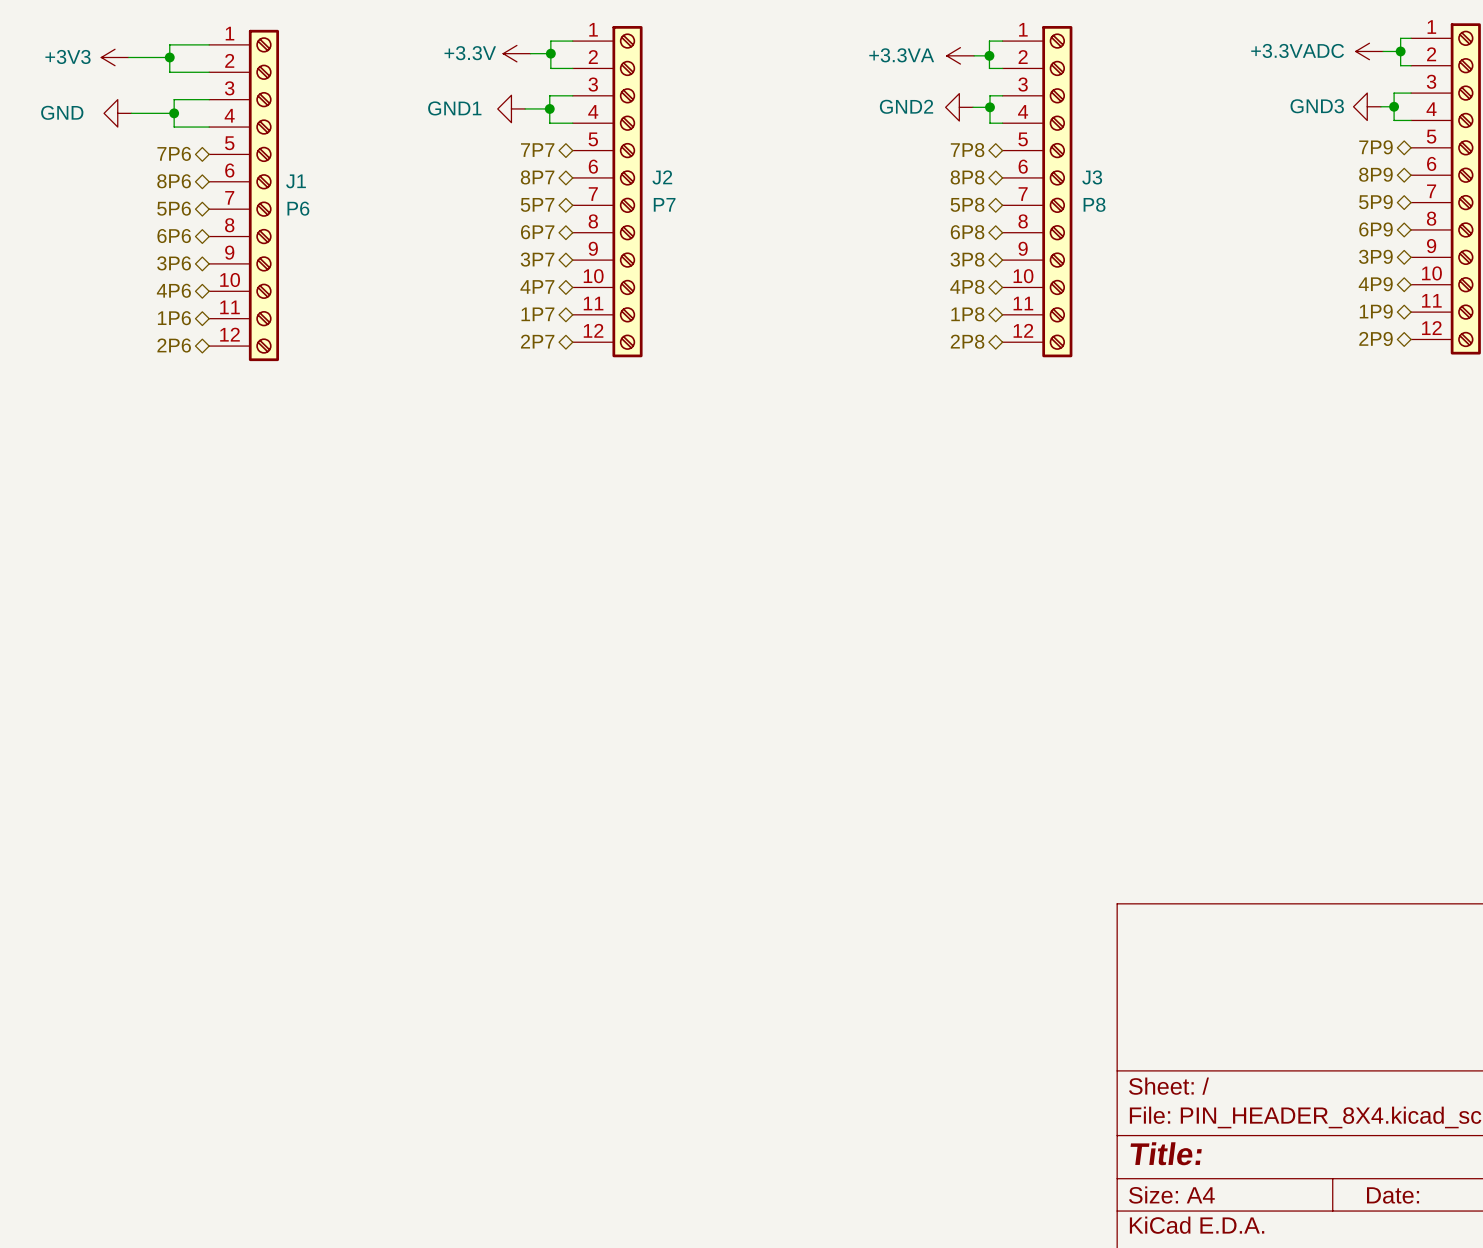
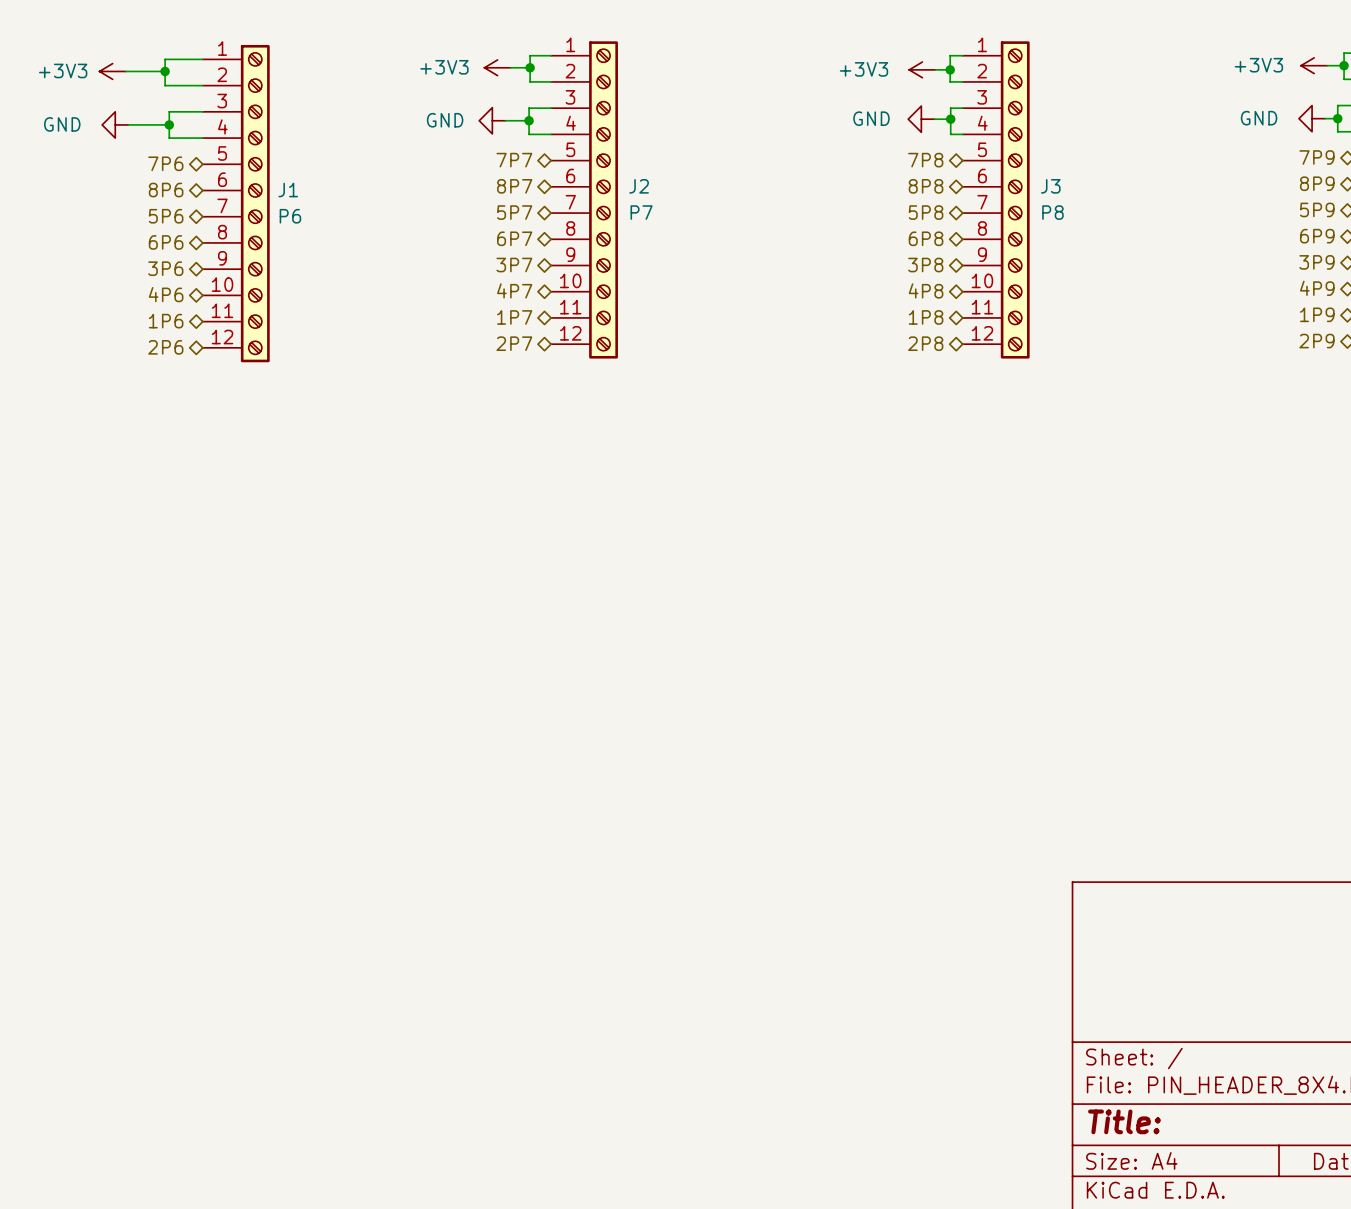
power symbol: +3.3VADC (1369, 51) -> +3V3 (1314, 65)
power symbol: +3.3V (516, 53) -> +3V3 (497, 67)
power symbol: +3.3VA (960, 55) -> +3V3 (922, 69)
power symbol: GND3 (1367, 106) -> GND (1312, 118)
power symbol: GND2 (959, 107) -> GND (921, 119)
power symbol: GND1 (511, 108) -> GND (492, 120)

